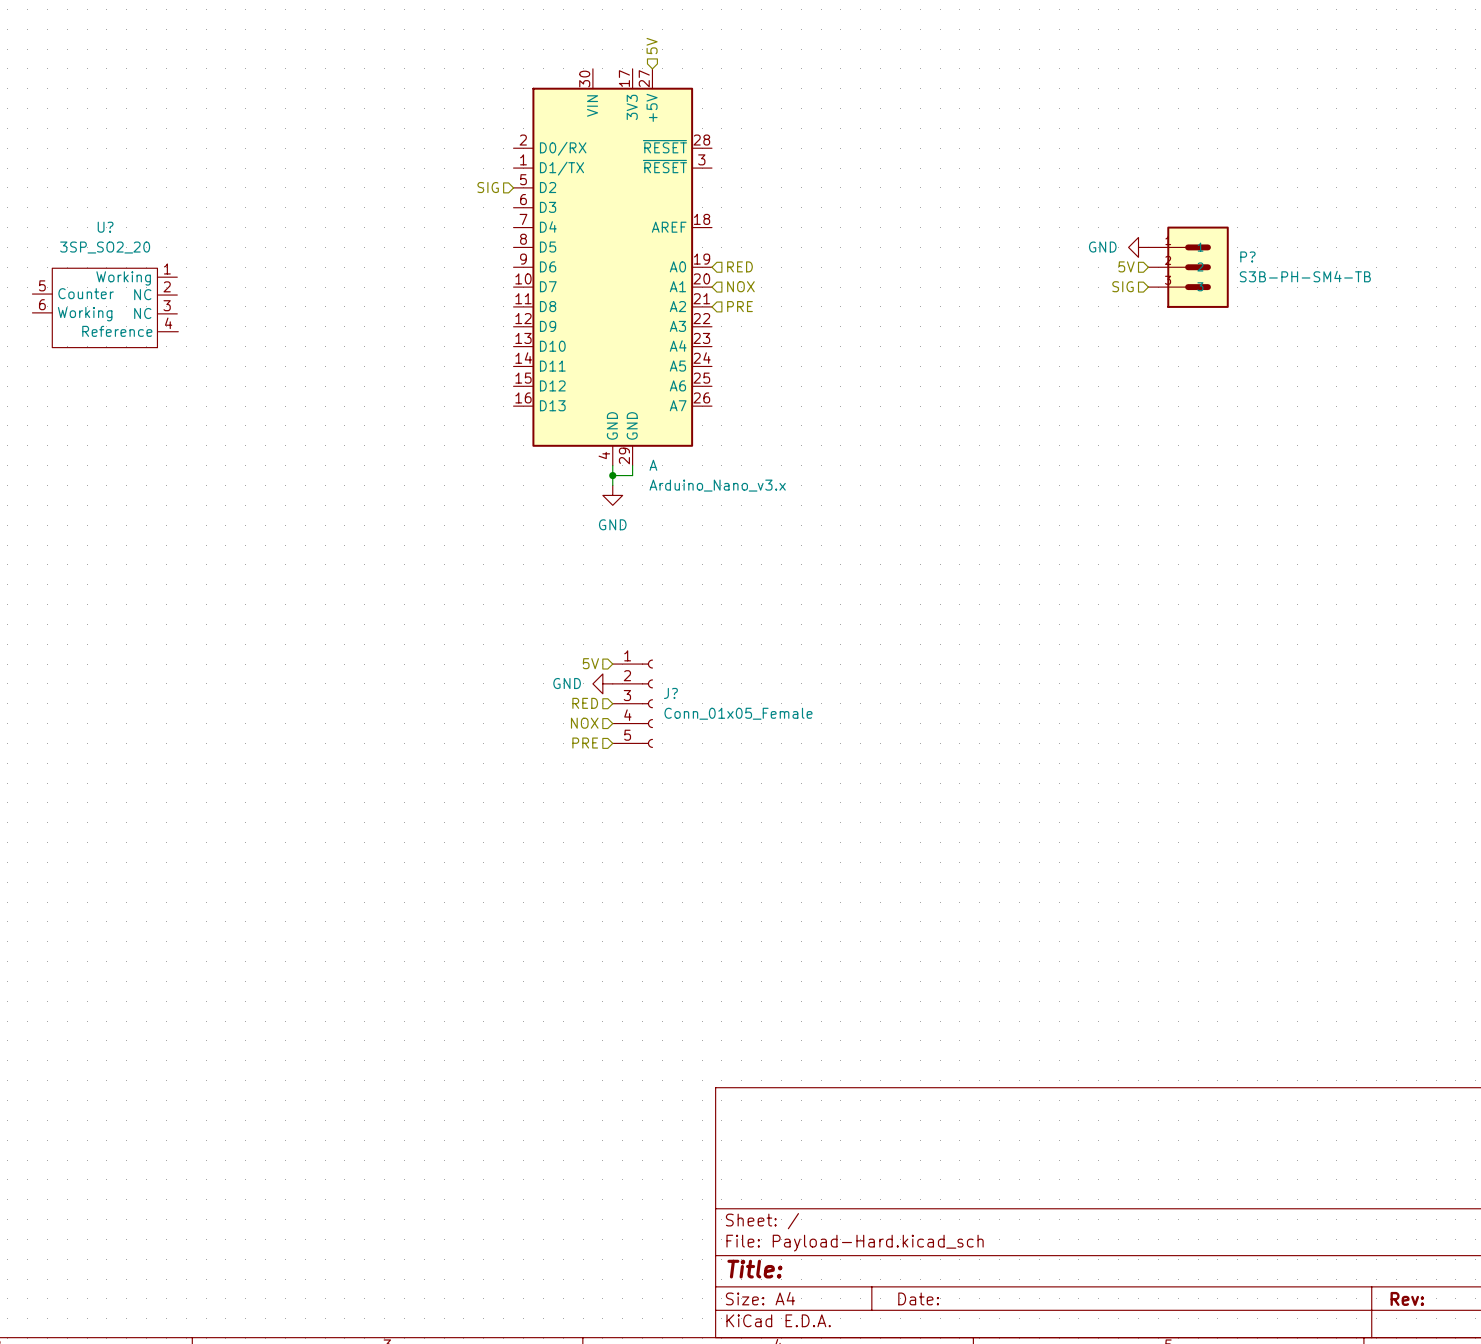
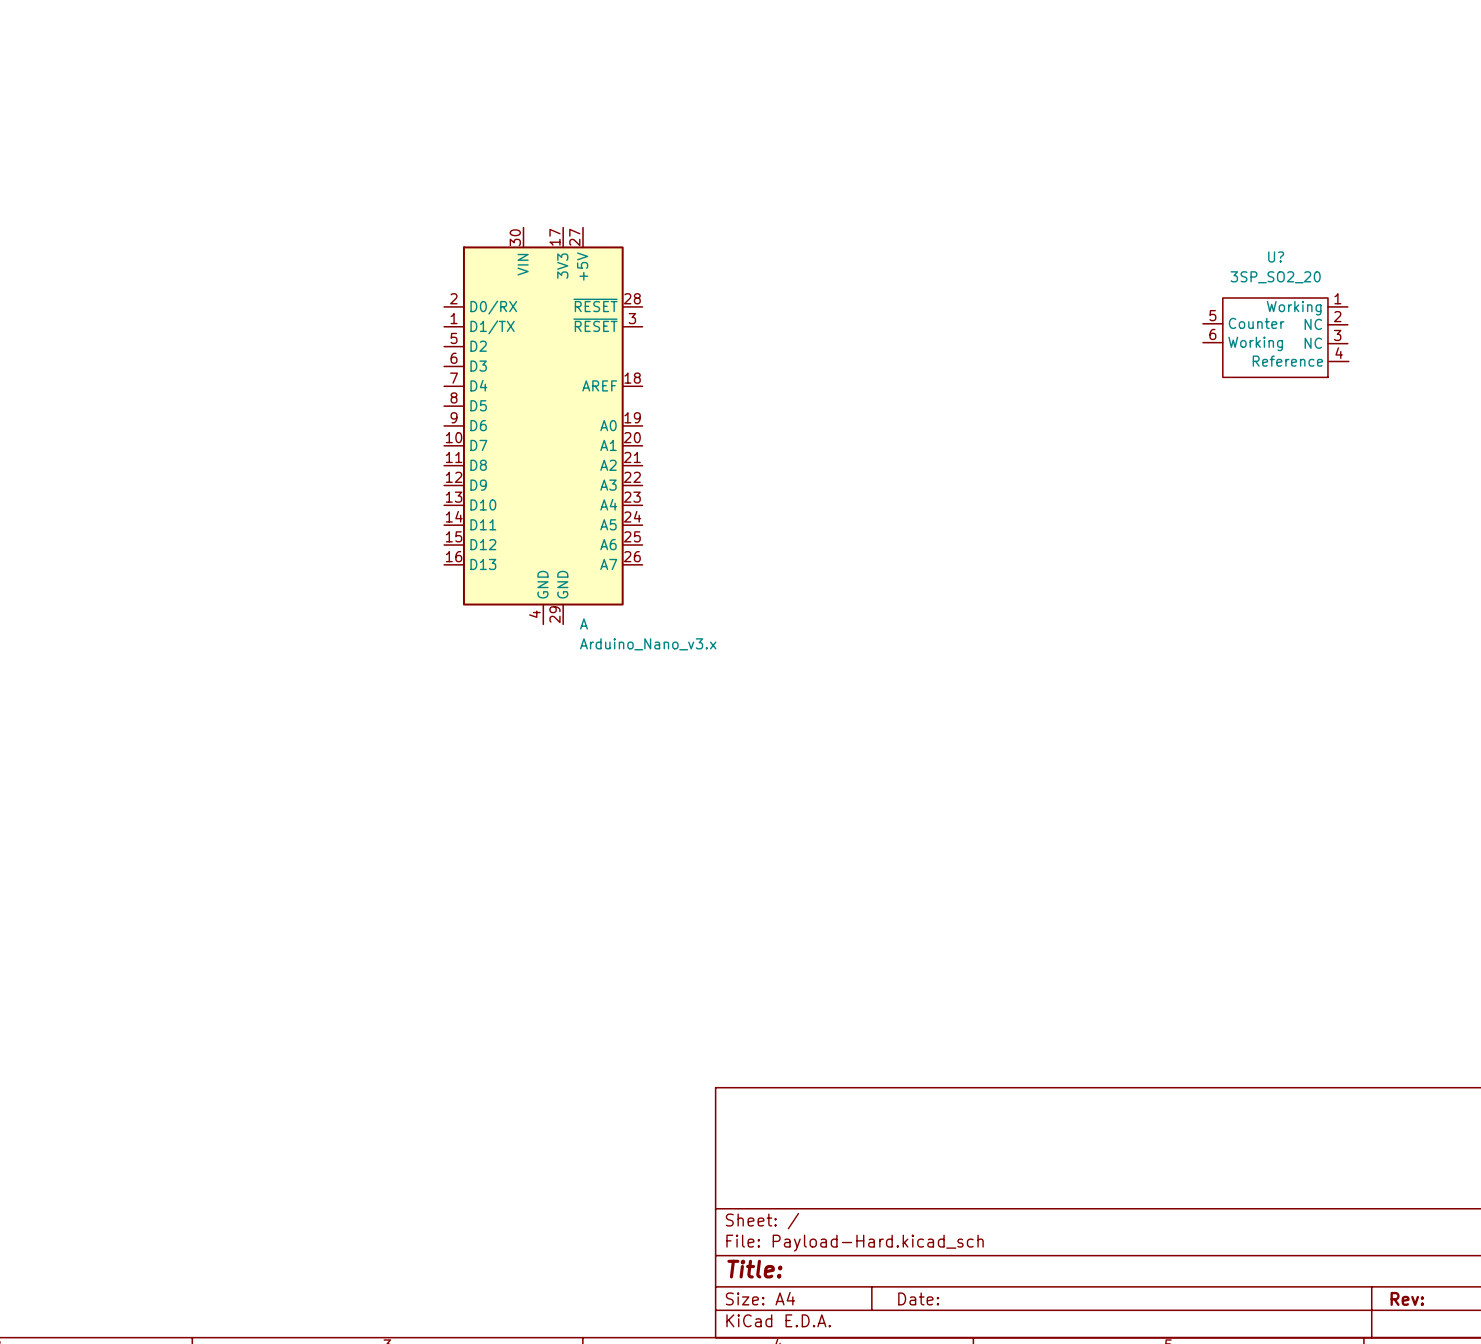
hierarchical label: 5V (652, 46) -> none
hierarchical label: SIG (488, 187) -> none
power symbol: GND (1138, 247) -> none
hierarchical label: RED (739, 266) -> none
hierarchical label: 5V (1126, 266) -> none
A position: (612, 267) -> (543, 425)
P?: S3B-PH-SM4-TB (1188, 267) -> none
hierarchical label: NOX (740, 286) -> none
hierarchical label: SIG (1123, 286) -> none
hierarchical label: PRE (739, 306) -> none
U?: 3SP_SO2_20 (105, 307) -> none
U?: none -> 3SP_SO2_20 (1275, 337)
wire: (632, 465) (632, 475) (612, 475) -> none
junction: (612, 475) -> none
power symbol: GND (612, 495) -> none
hierarchical label: 5V (590, 663) -> none
power symbol: GND (602, 683) -> none
hierarchical label: RED (585, 703) -> none
J?: Conn_01x05_Female (632, 703) -> none
hierarchical label: NOX (584, 723) -> none
hierarchical label: PRE (585, 743) -> none

